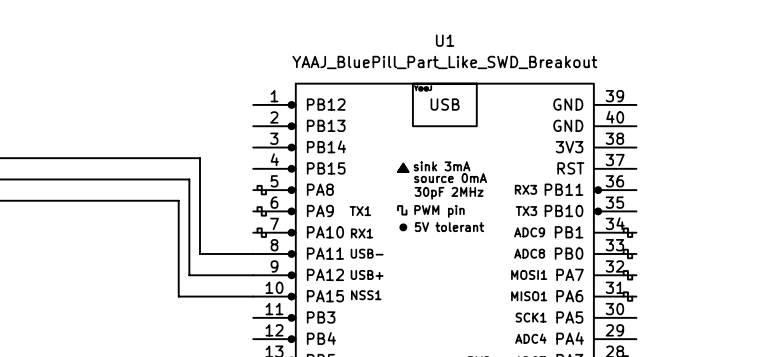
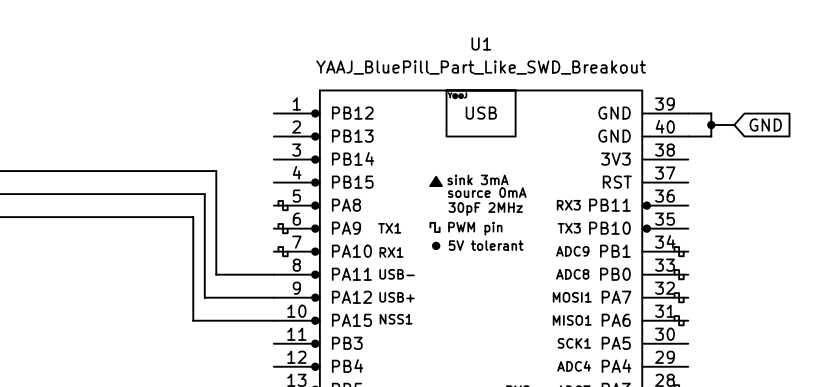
wire: none -> (688, 113) (711, 113) (711, 136) (688, 136)
wire: none -> (711, 125) (734, 125)
junction: none -> (711, 125)
global label: none -> GND (765, 125)

